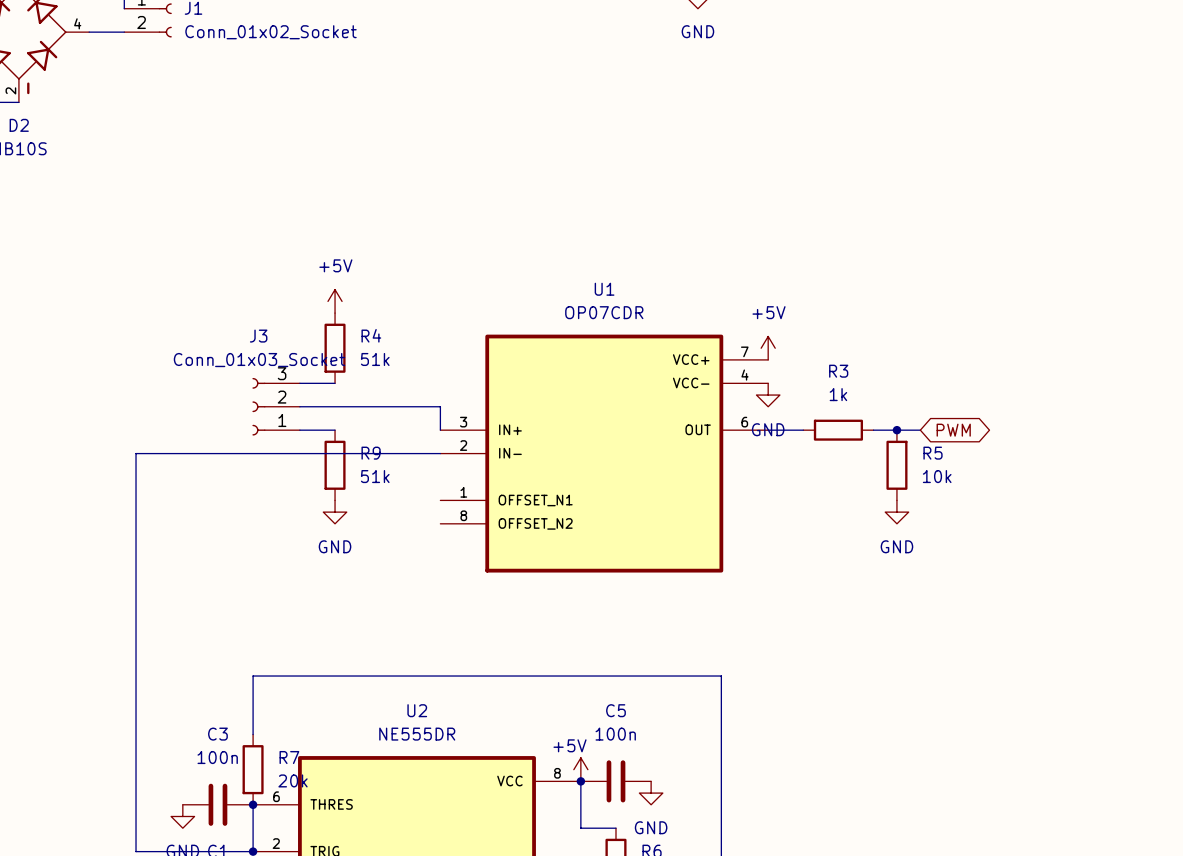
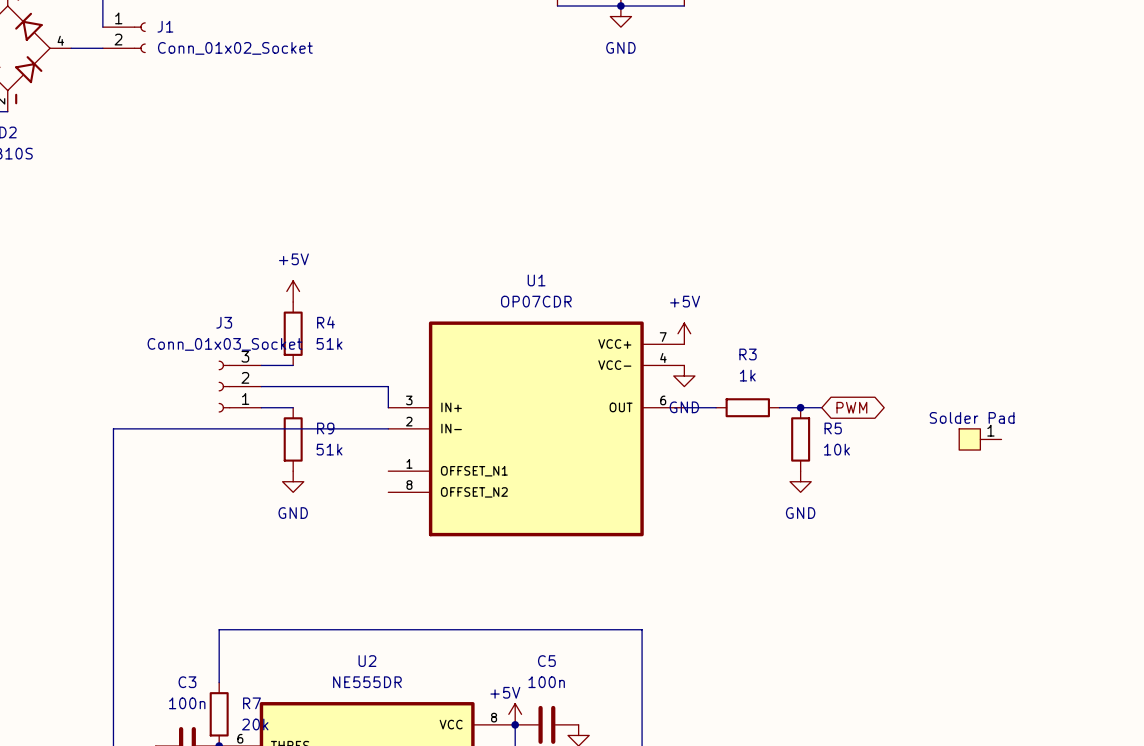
part: none -> Solder Pad (980, 439)

